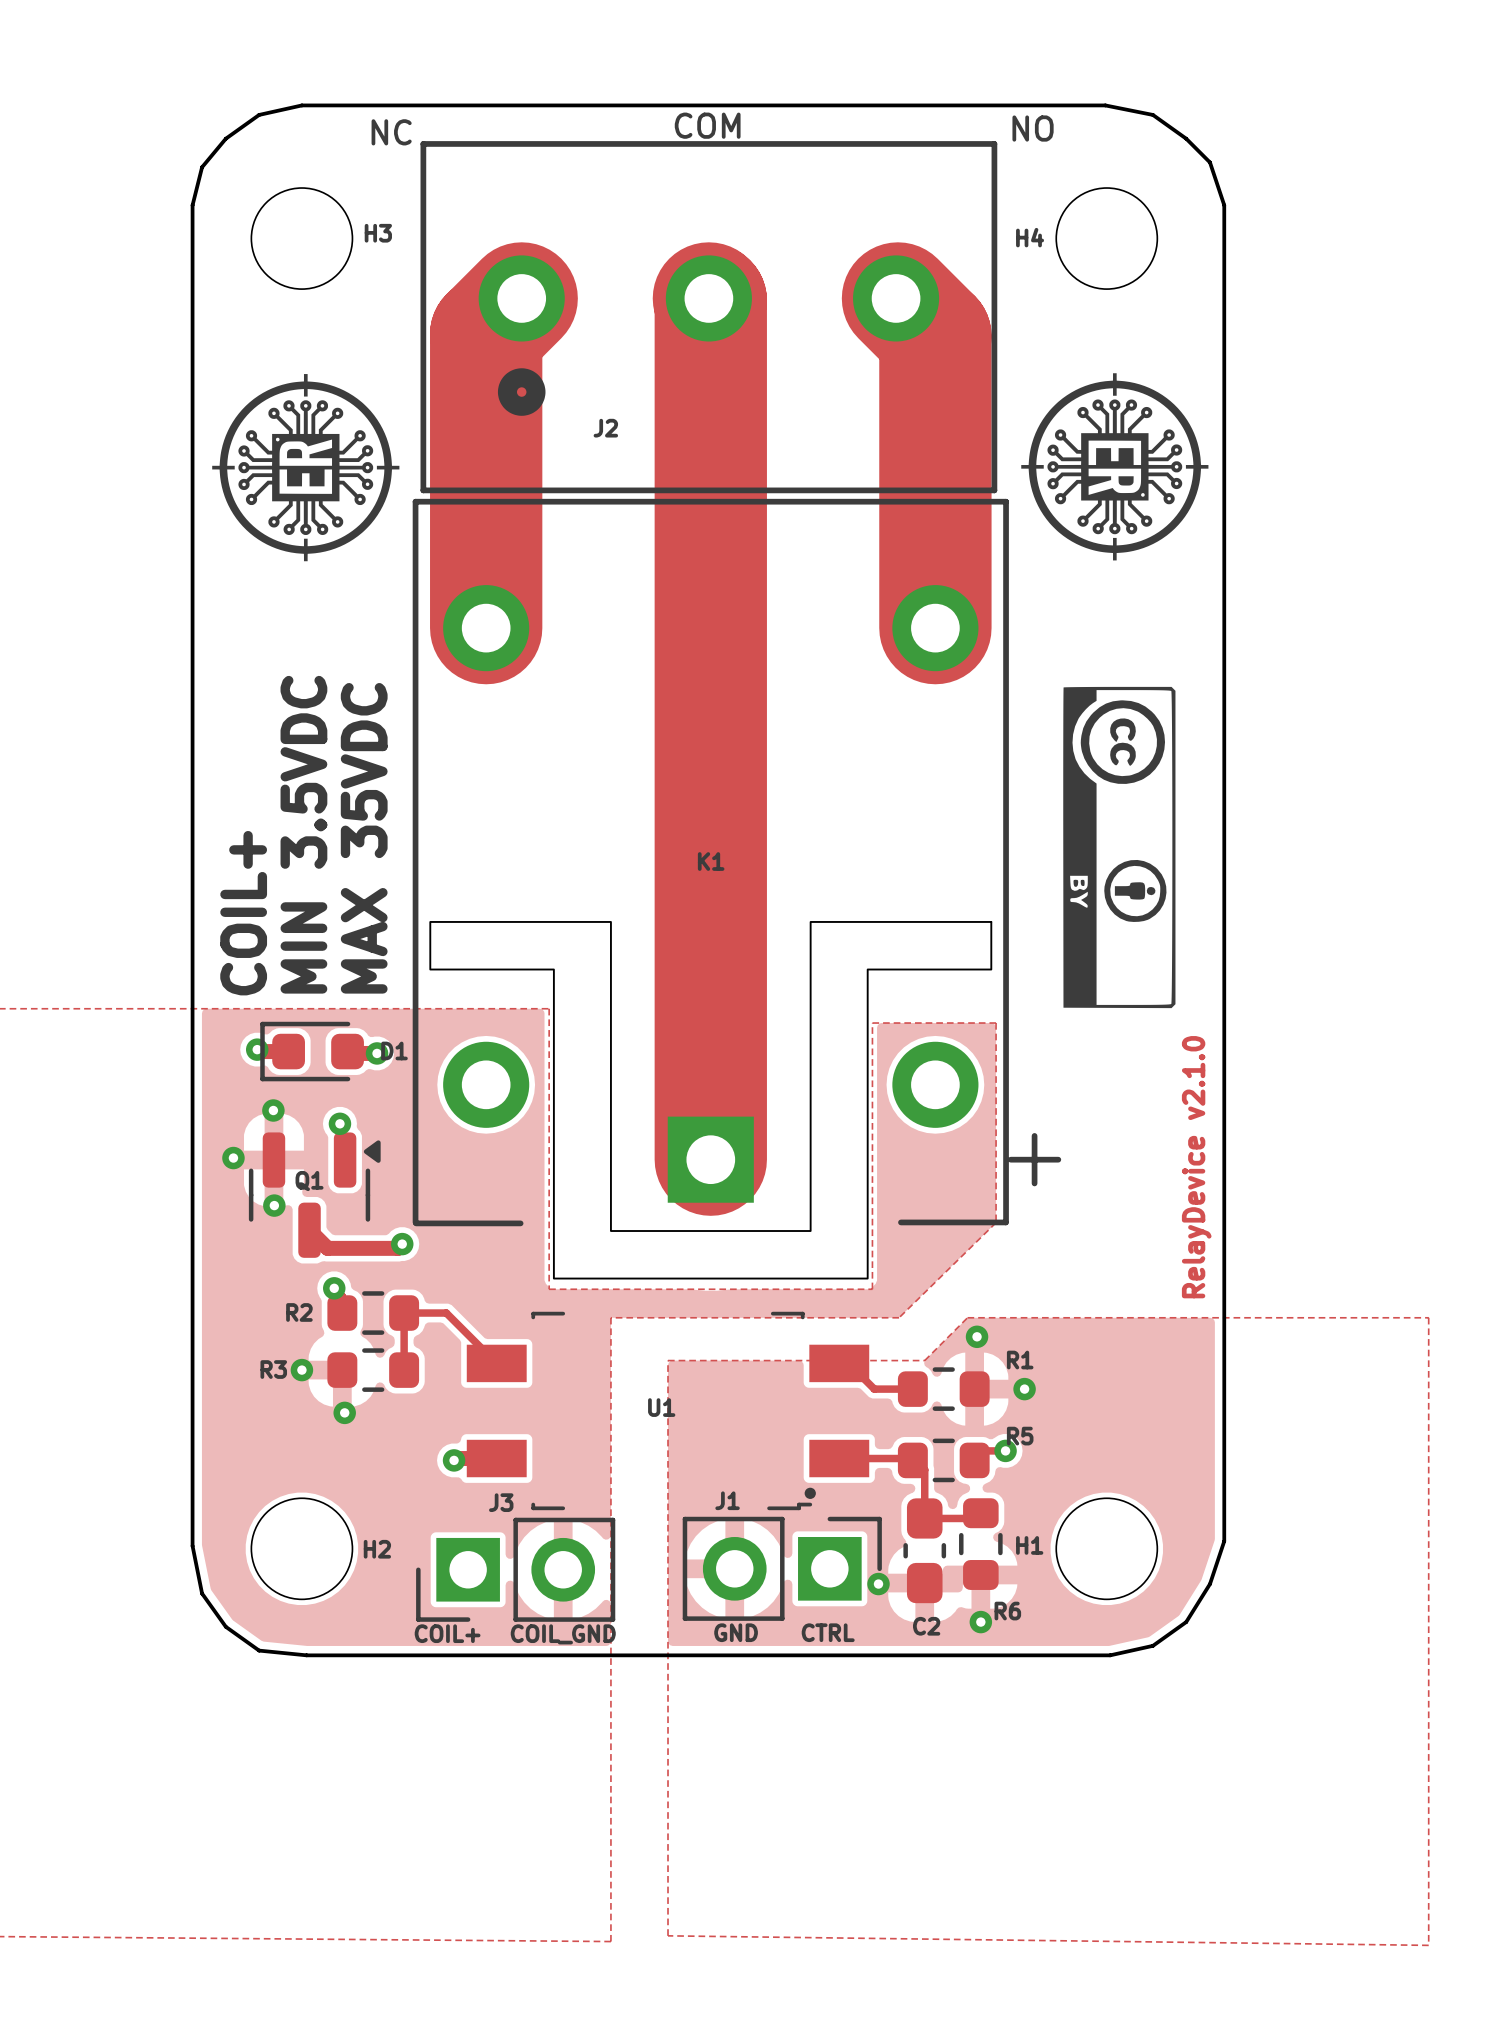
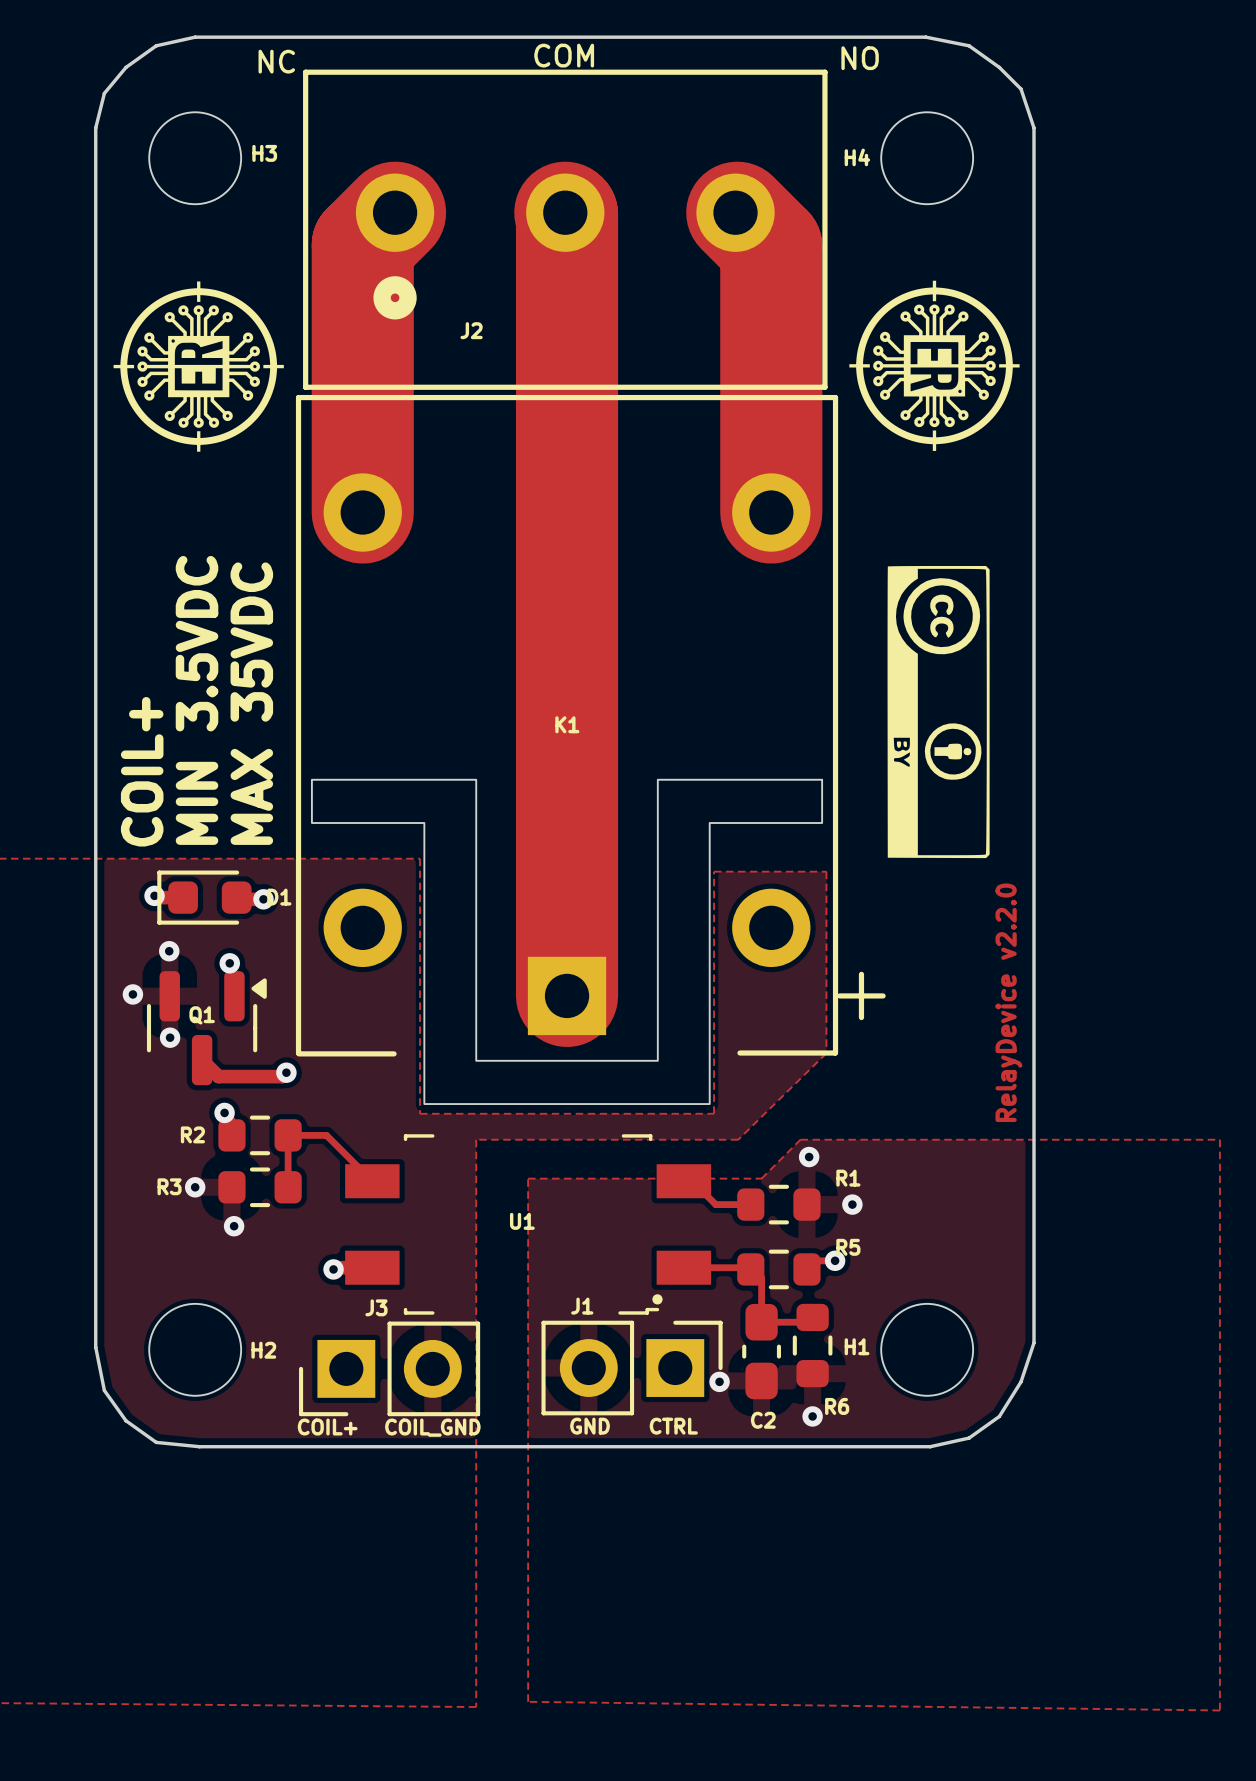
text: RelayDevice v2.1.0 (1196, 1167) -> RelayDevice v2.2.0 (1008, 1002)

